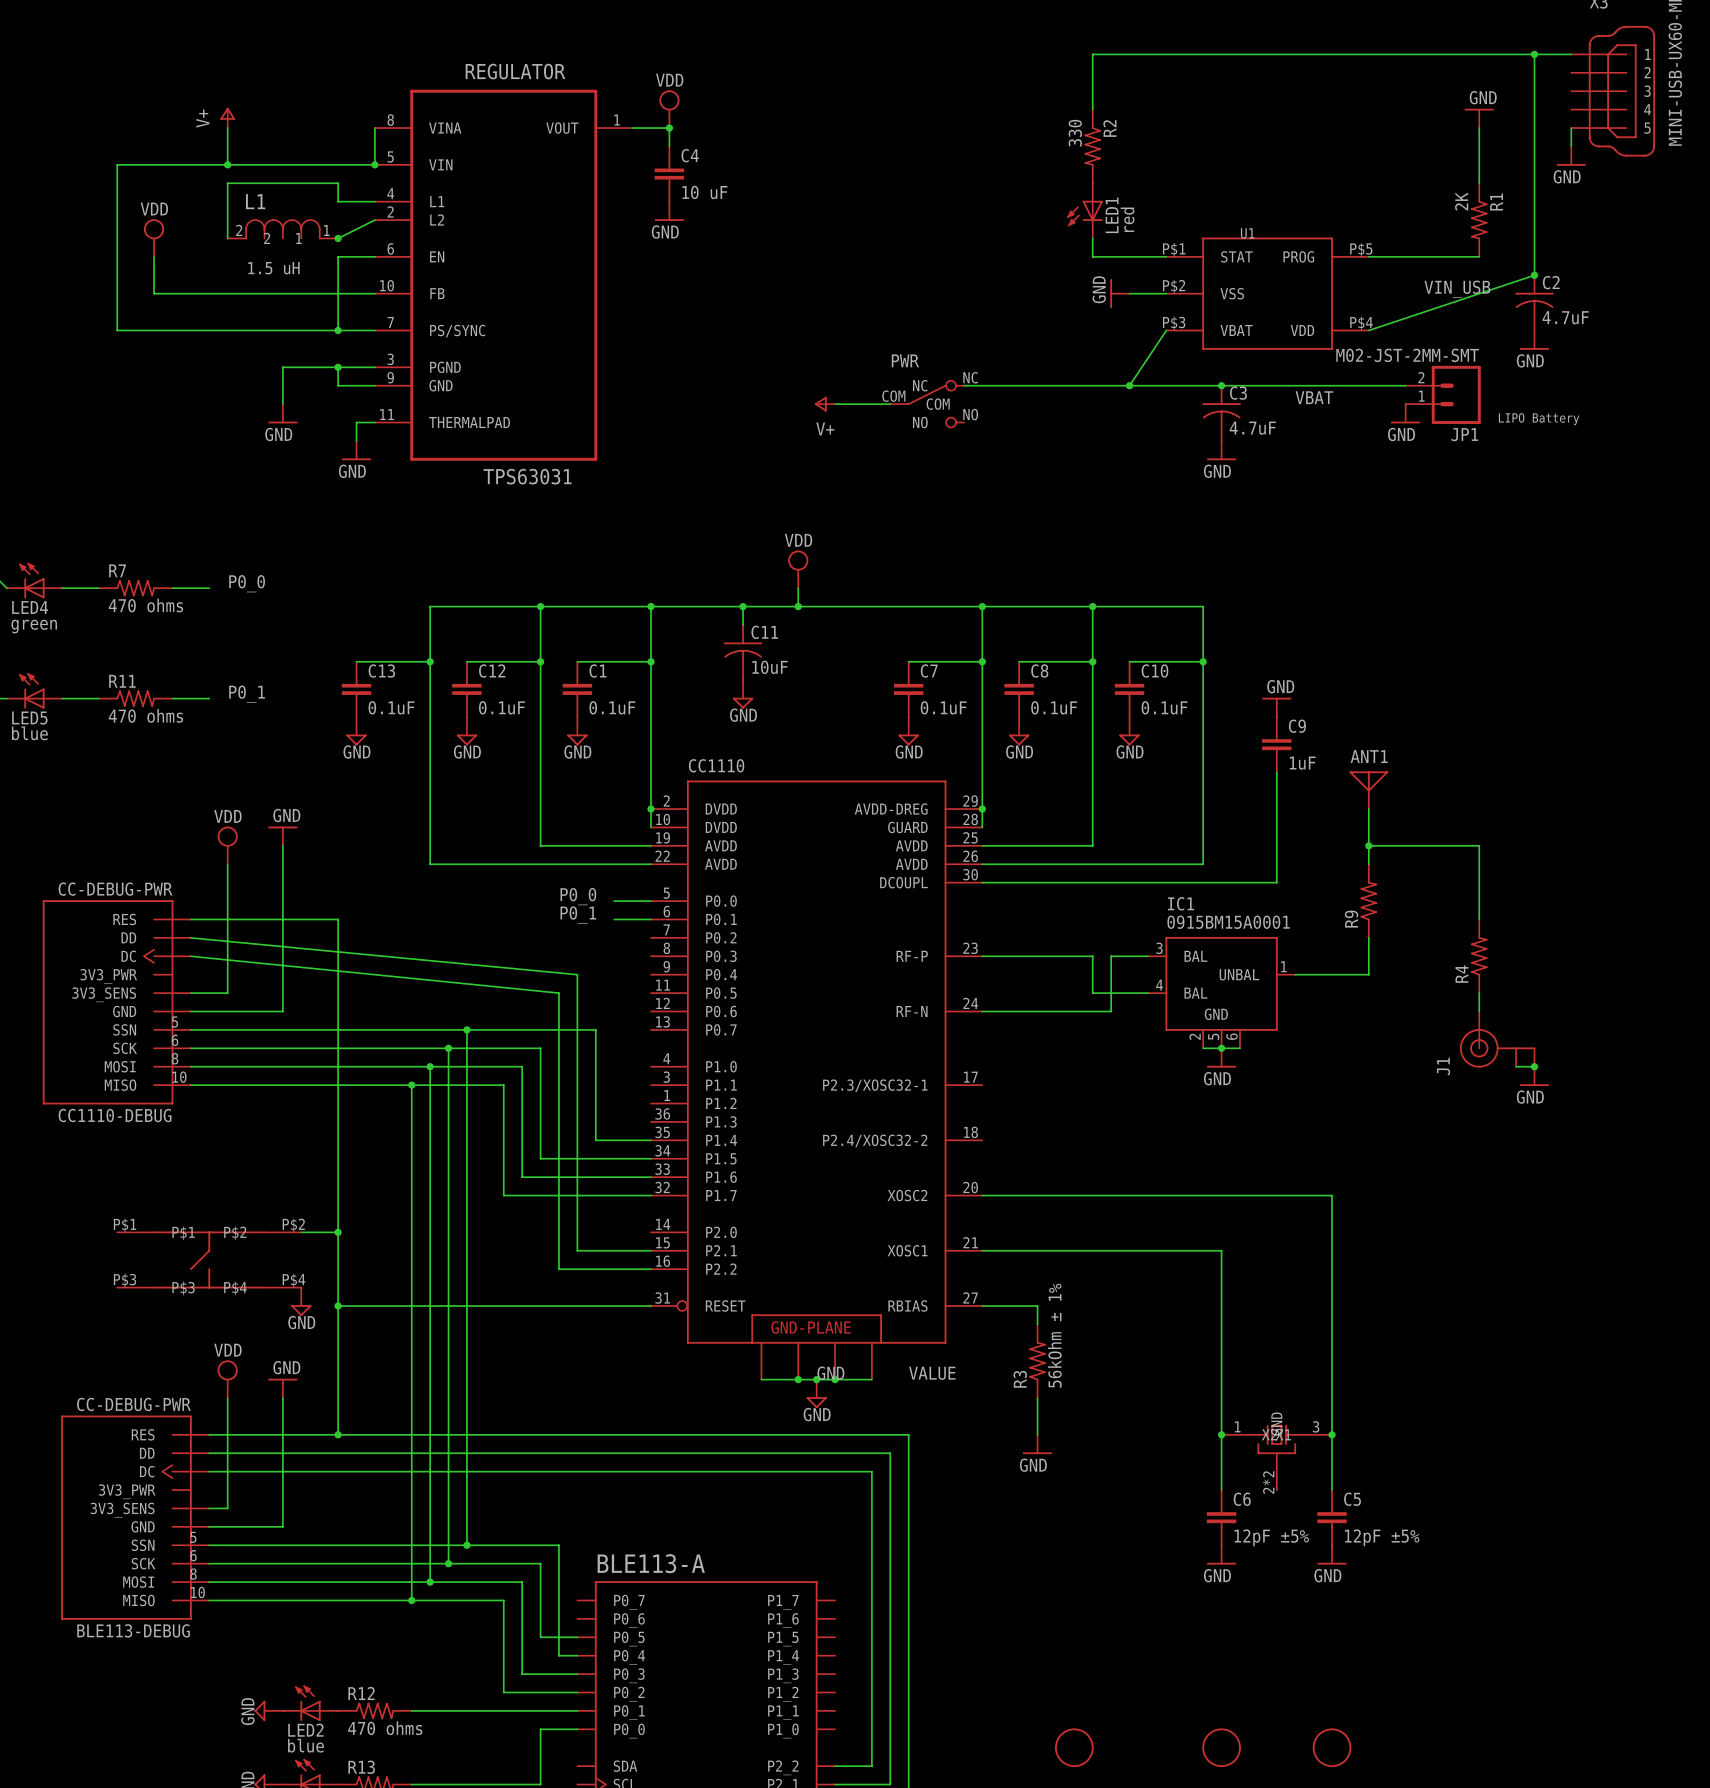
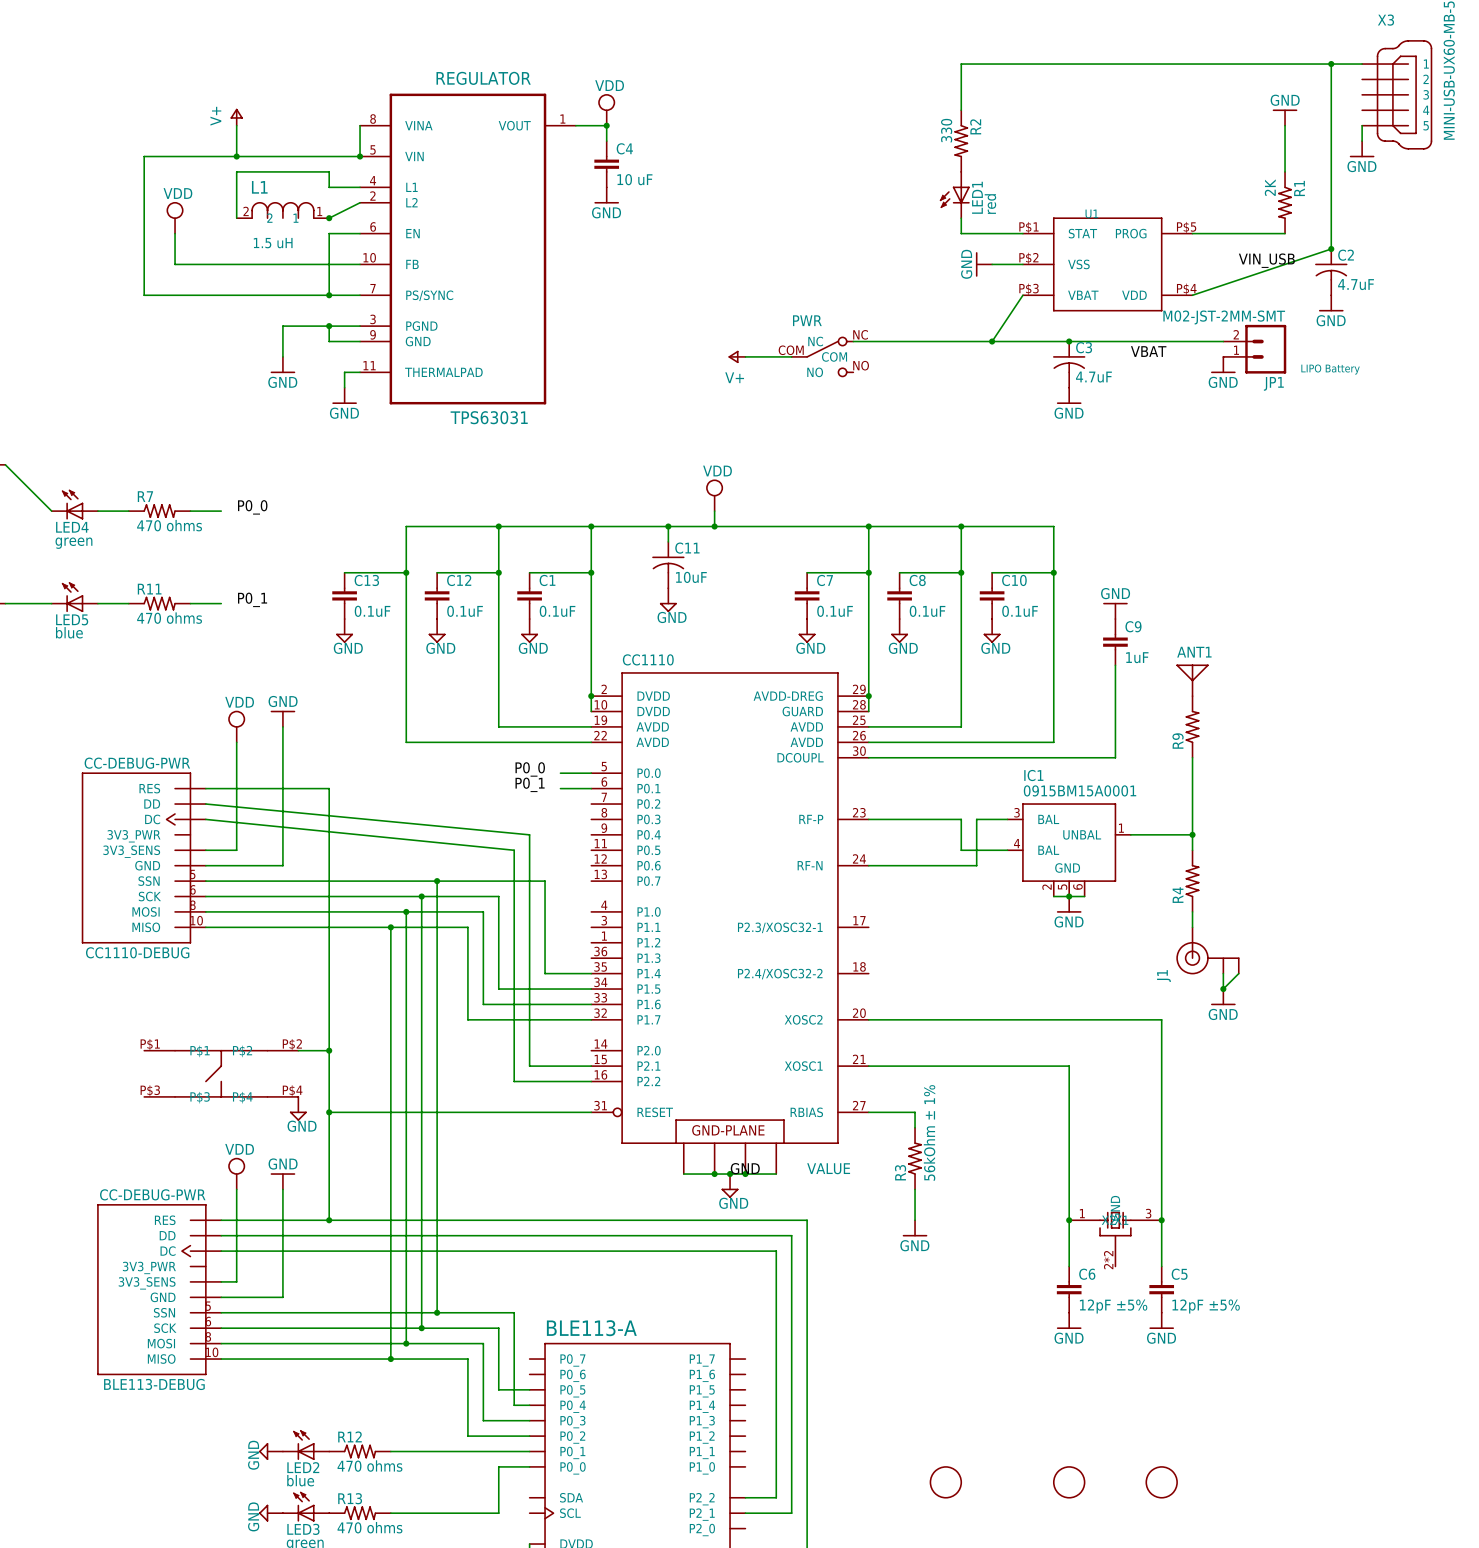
wire: (1368, 845) (1479, 845) (1479, 919) -> none
junction: (1368, 845) -> none
R9 position: (1368, 901) -> (1192, 726)
R4 position: (1479, 956) -> (1192, 881)
junction: none -> (1192, 834)
wire: (1479, 993) (1479, 1011) -> (1192, 834) (1192, 850)
J1 position: (1497, 1039) -> (1207, 950)
wire: none -> (1192, 911) (1192, 927)
wire: (1516, 1066) (1534, 1066) -> none
junction: (1534, 1066) -> none
power symbol position: GND (1534, 1076) -> GND (1223, 997)
wire: none -> (1223, 973) (1223, 989) (1238, 973)
junction: none -> (1223, 989)

